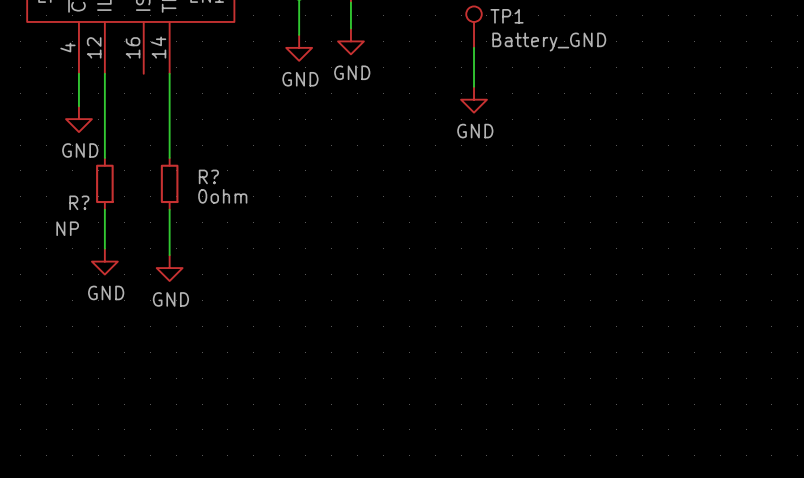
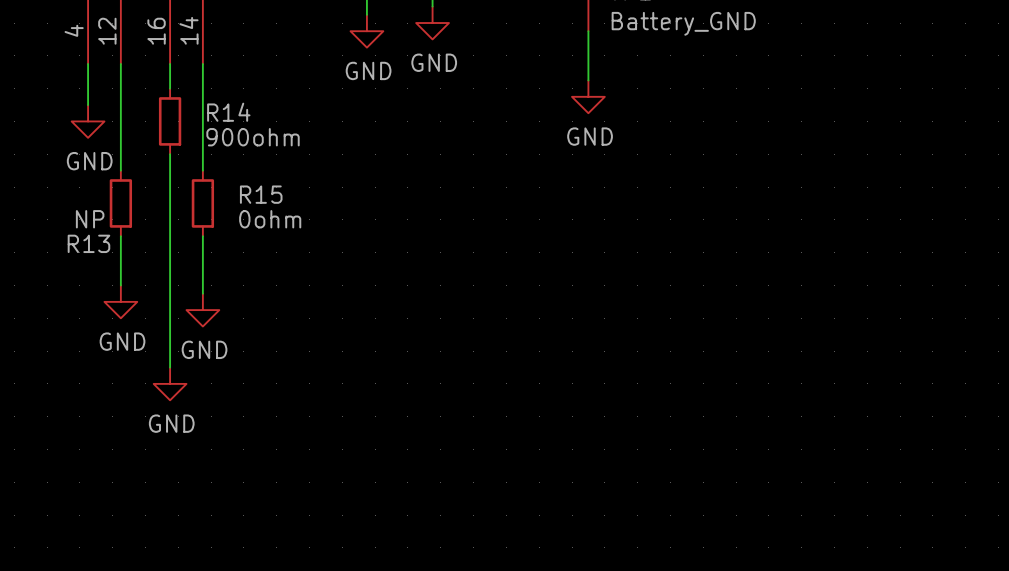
wire: none -> (170, 64) (170, 88)
R14: none -> 900ohm (170, 121)
wire: none -> (170, 154) (170, 367)
R? name: R? (208, 176) -> R15 (261, 194)
R? name: R? (79, 202) -> R13 (88, 243)
R? value position: NP (67, 228) -> NP (90, 219)
power symbol: none -> GND (170, 383)

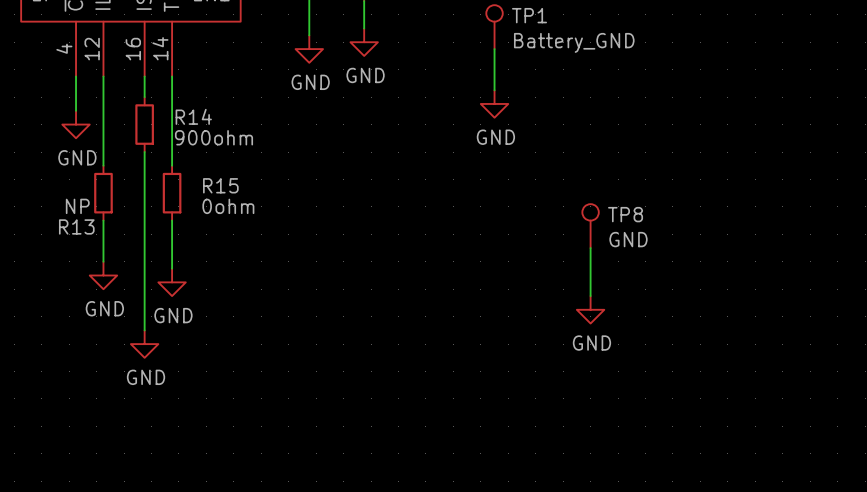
TP8: none -> GND (590, 226)
wire: none -> (590, 248) (590, 296)
power symbol: none -> GND (590, 309)

